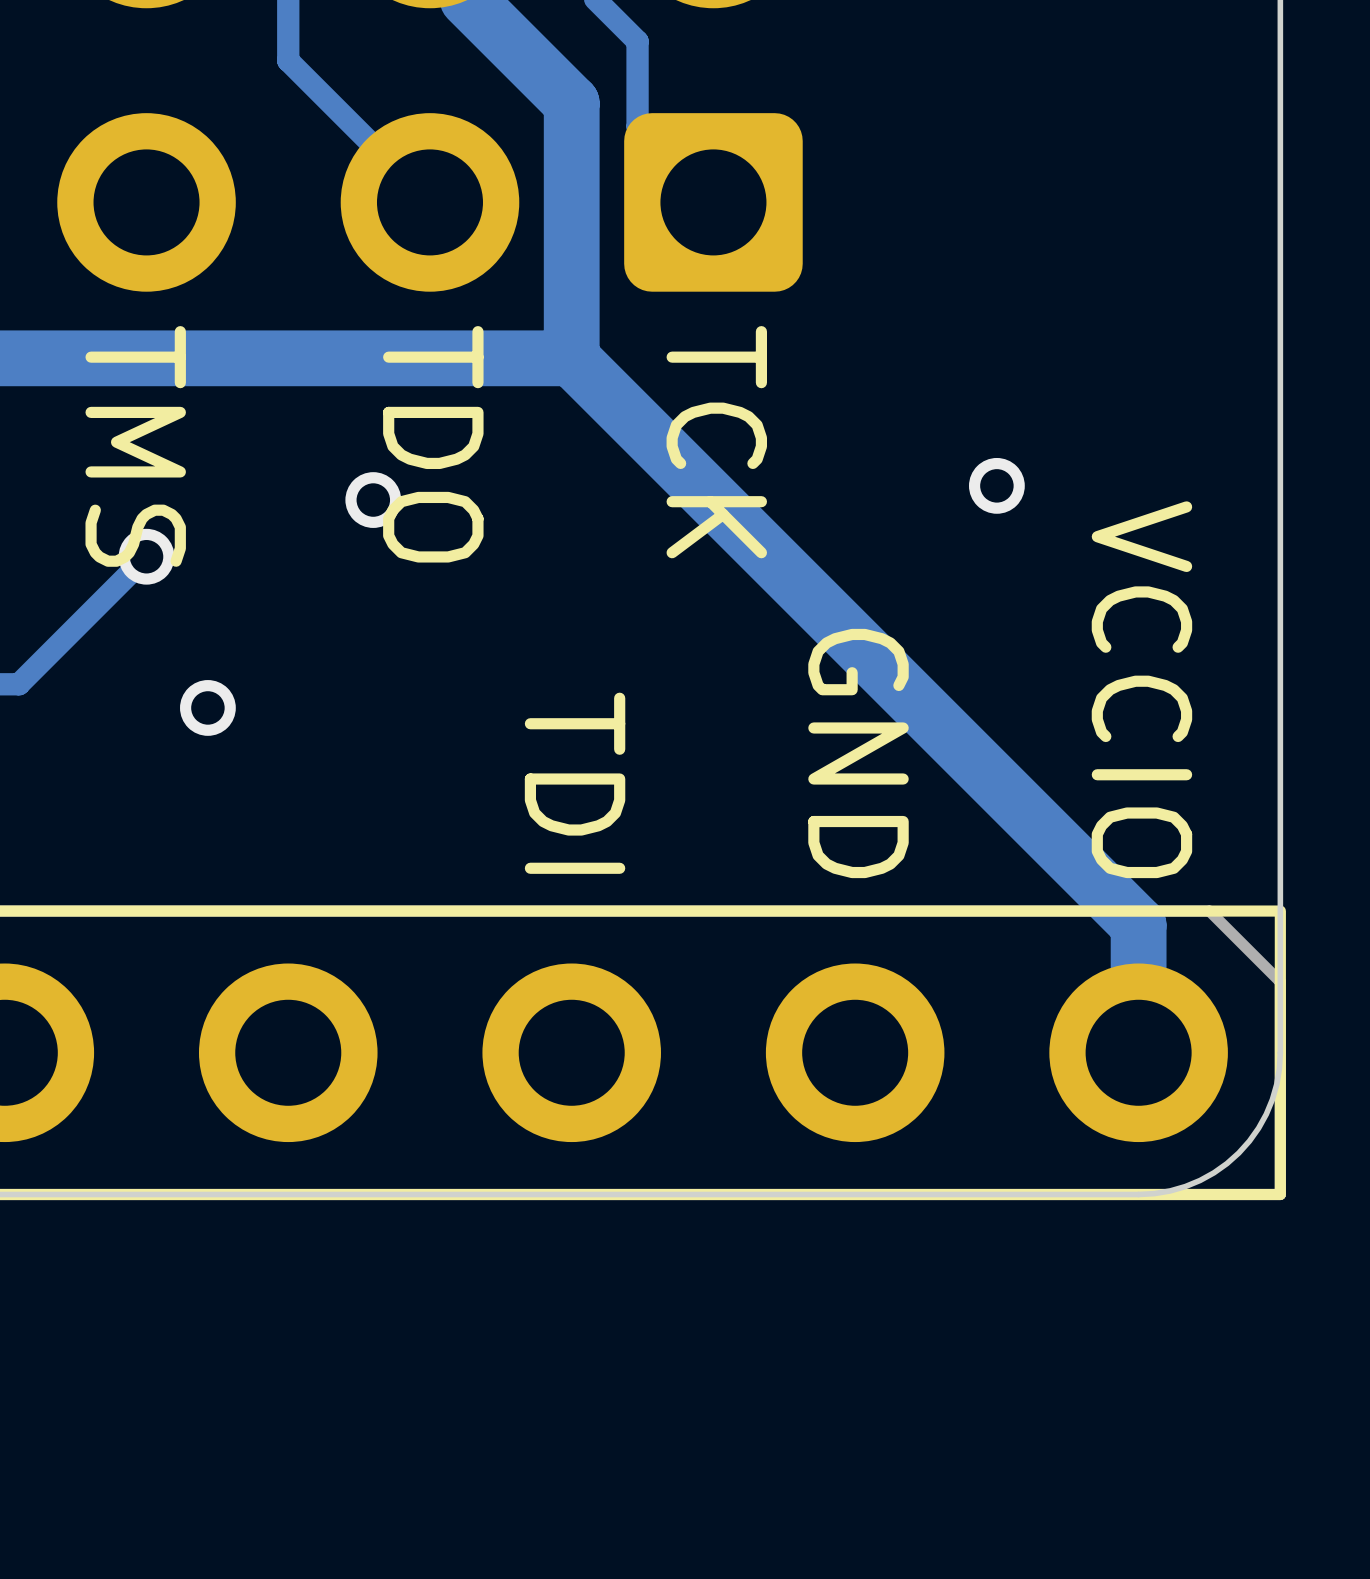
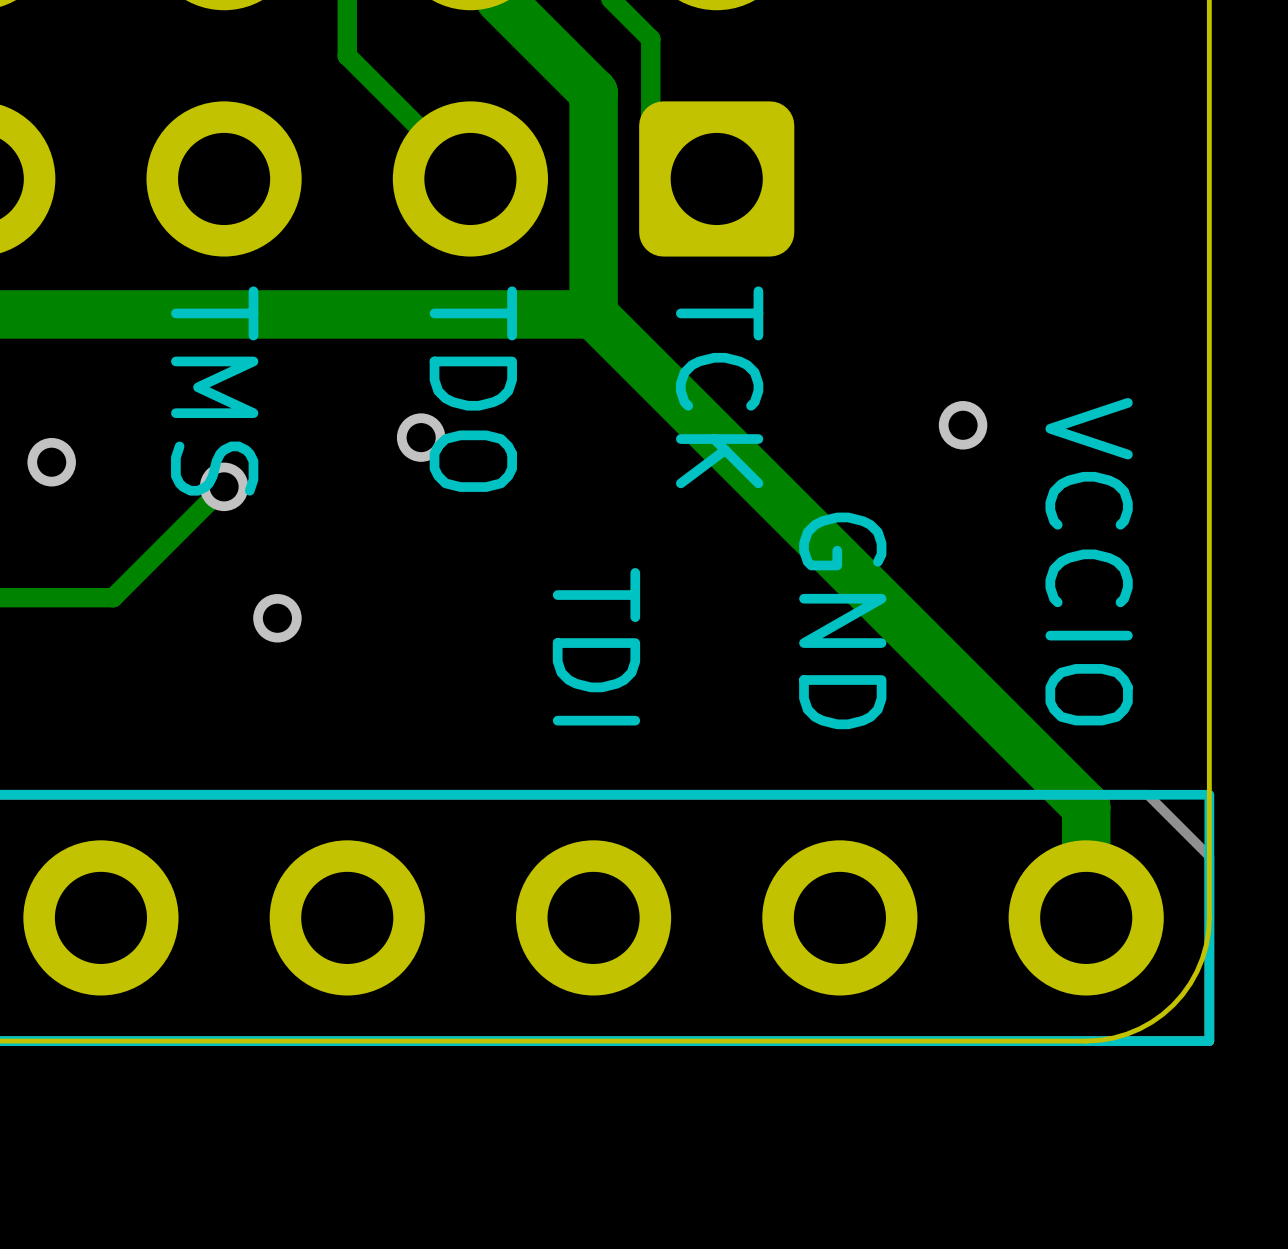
text position: VCCIO (1141, 689) -> VCCIO (1089, 561)
text position: GND (858, 753) -> GND (842, 620)
text position: TDI (575, 783) -> TDI (596, 646)

